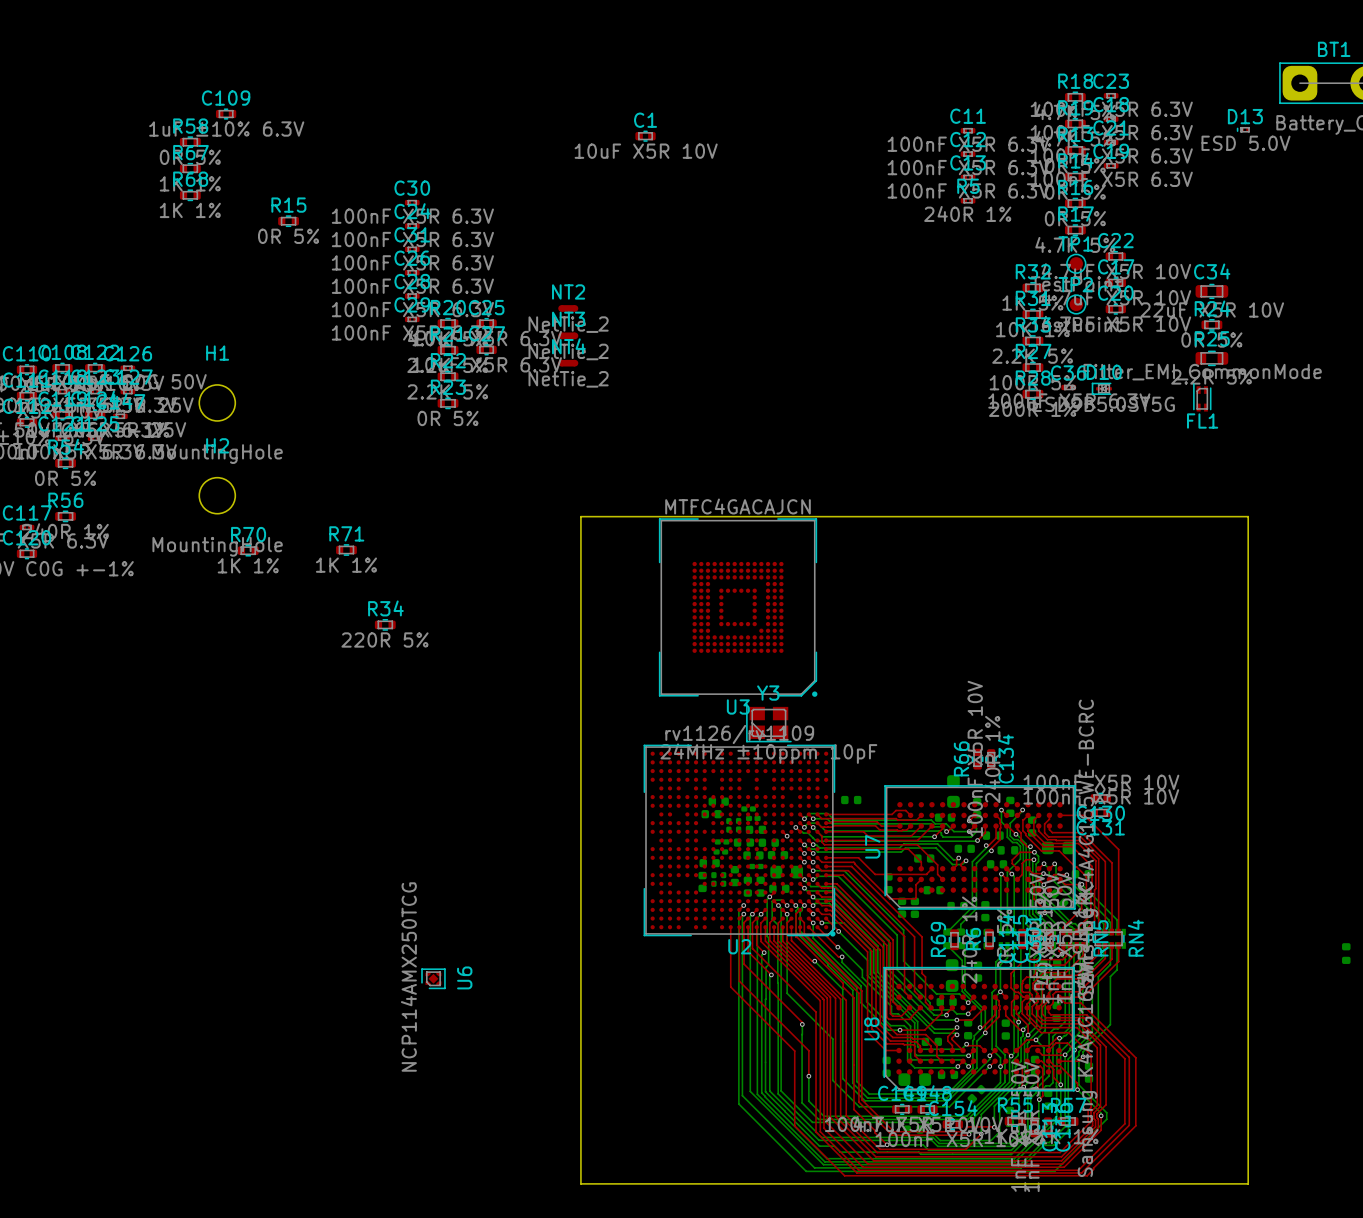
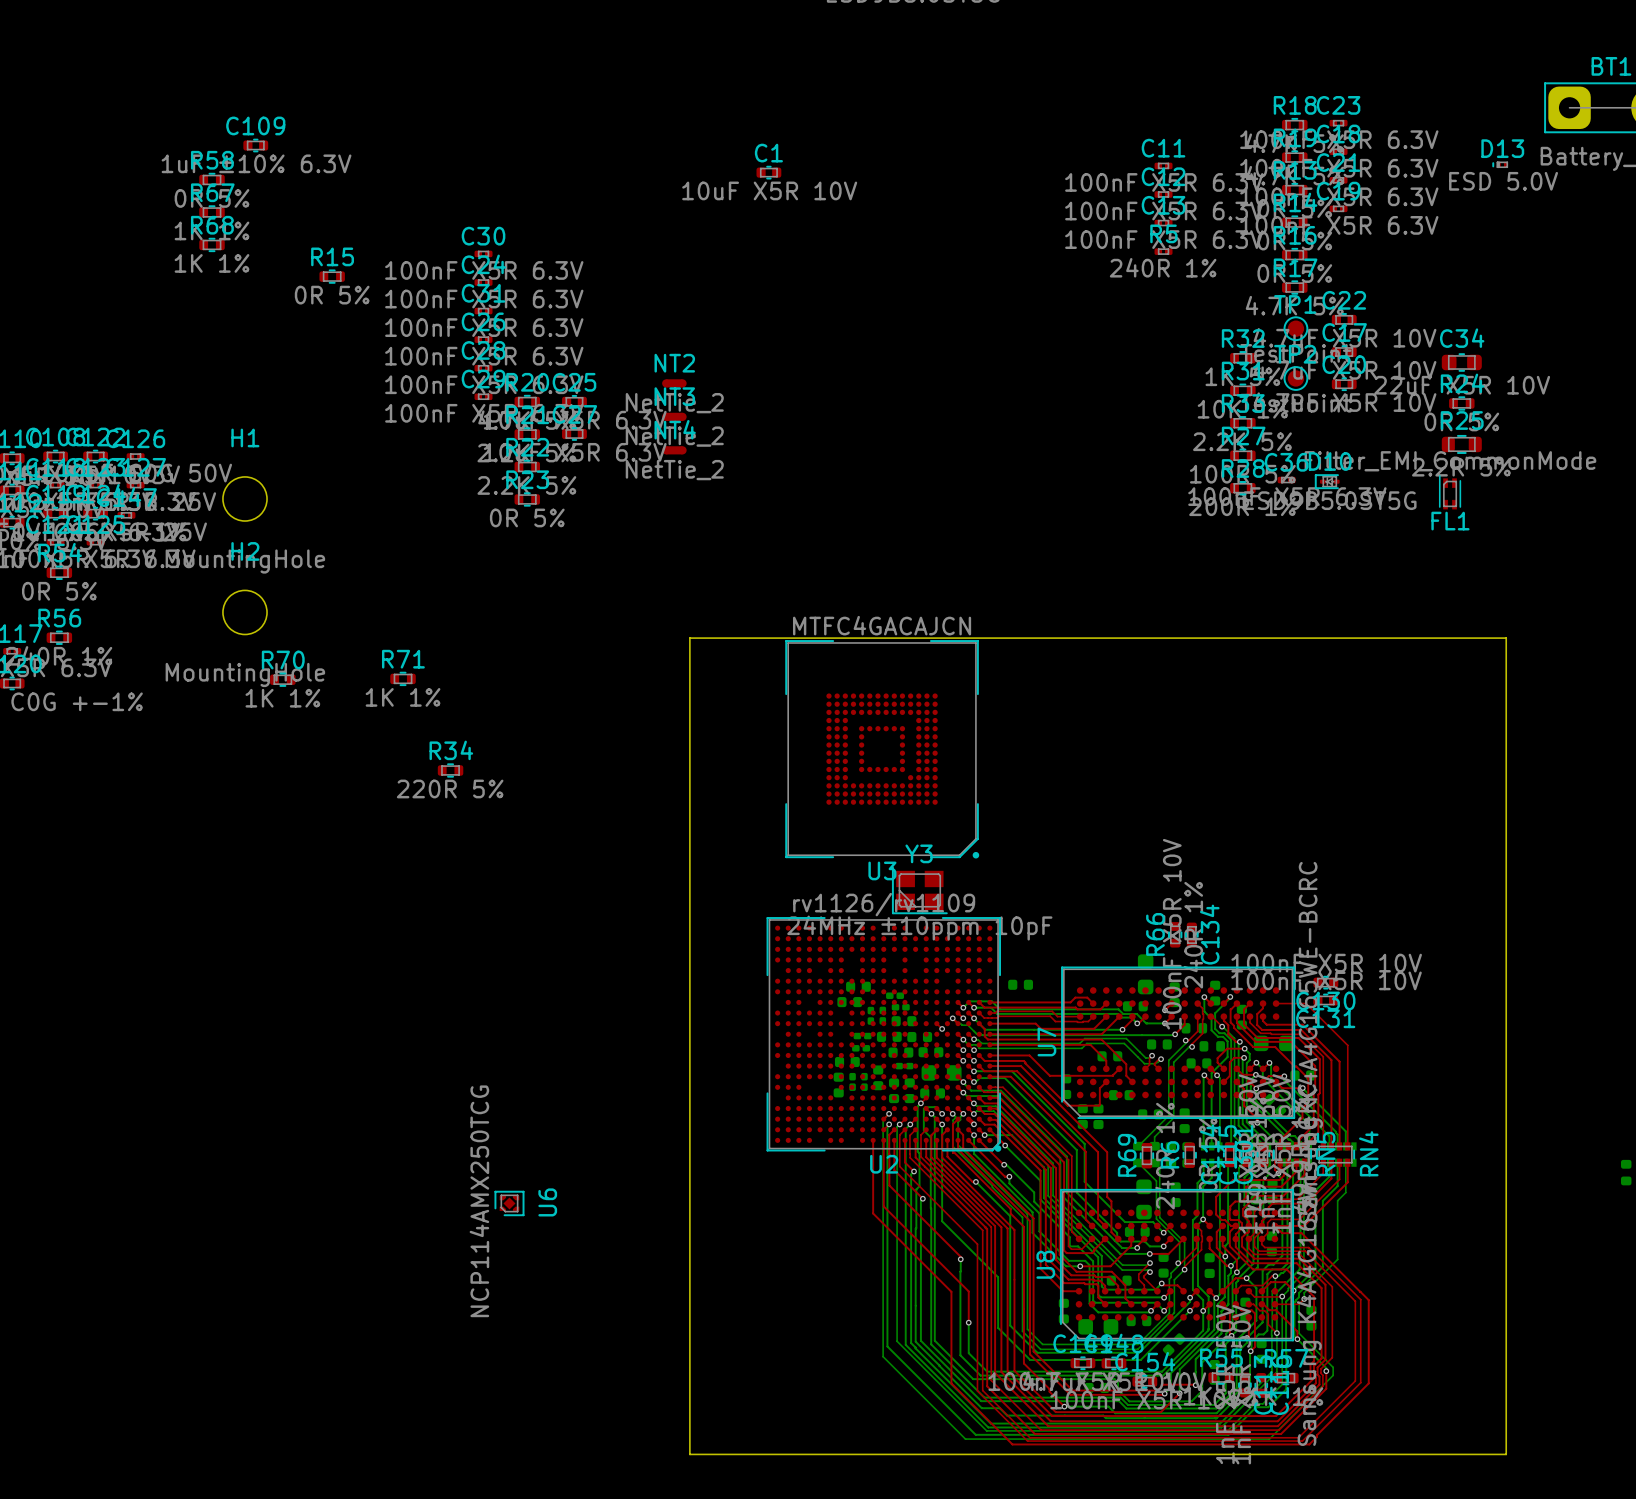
bottom track: (969, 820) (976, 828) (976, 831) (971, 837) (942, 836) -> none
bottom track: (804, 827) (808, 823) (817, 823) (825, 831) (939, 831) (942, 836) -> none

